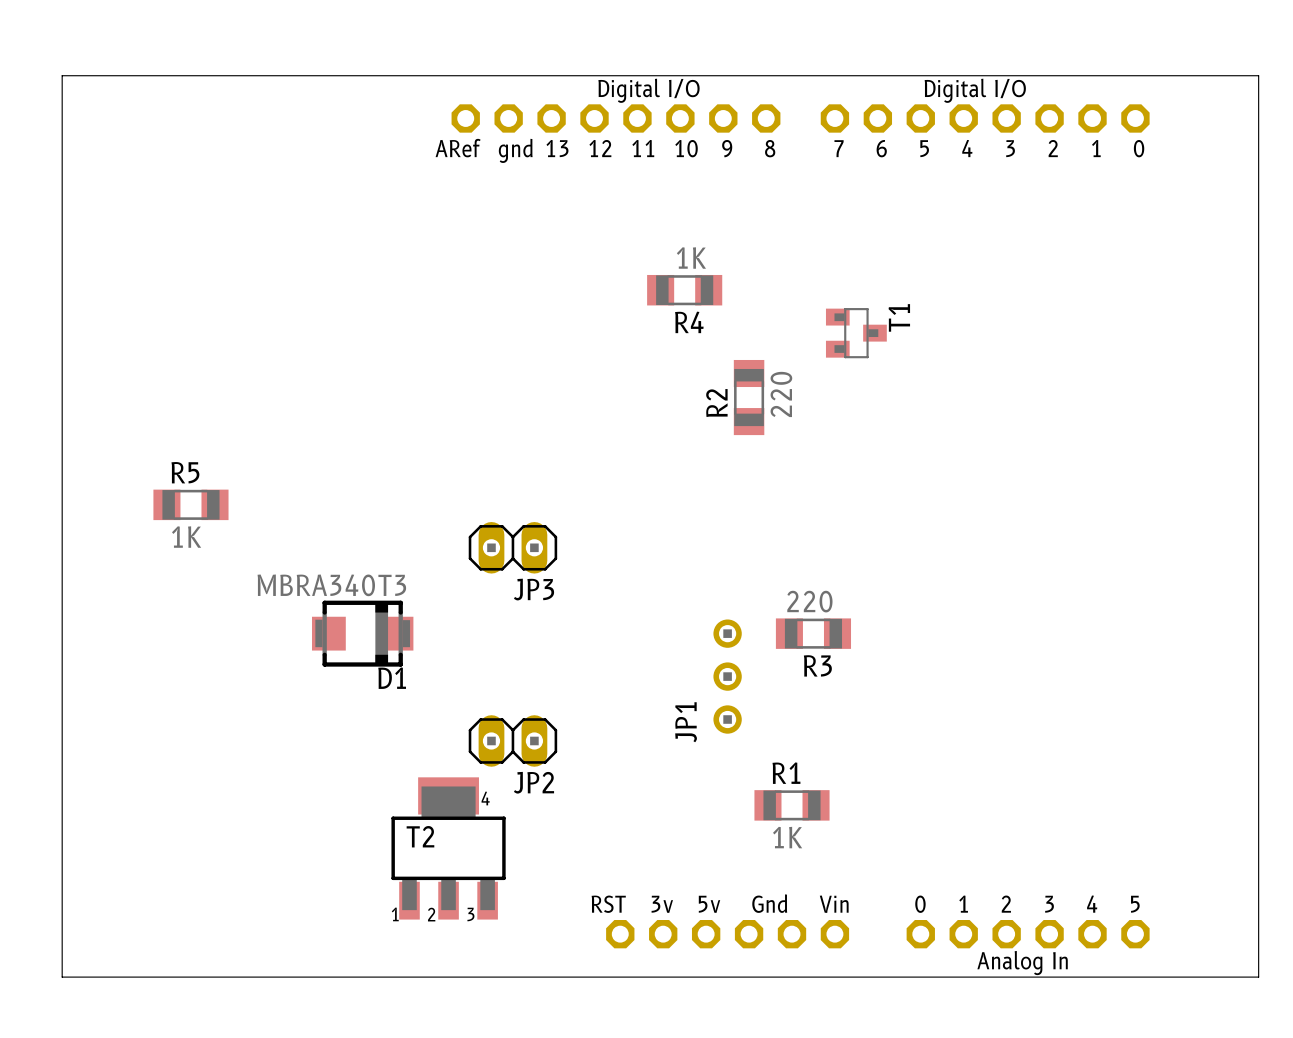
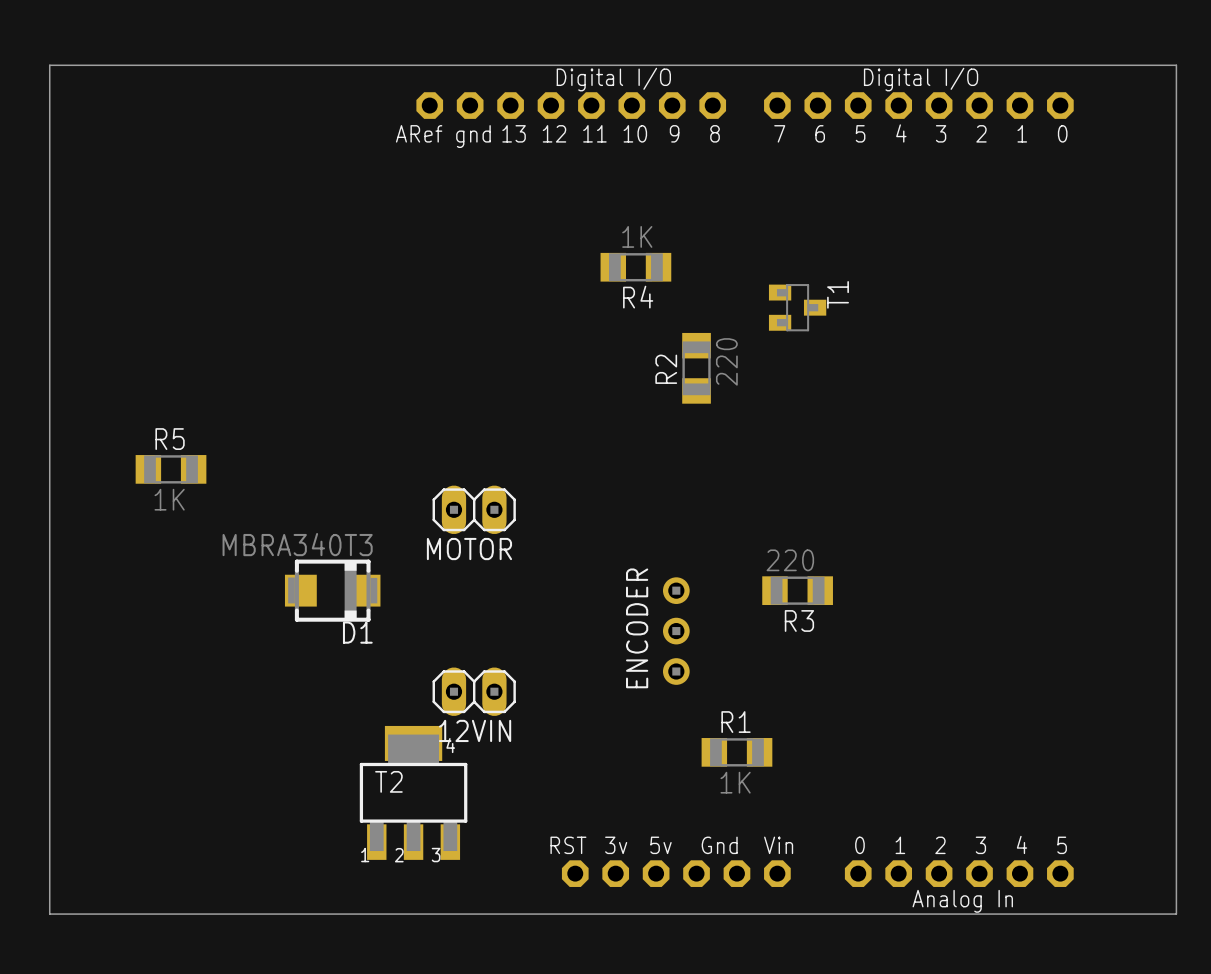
JP3 name: JP3 (534, 589) -> MOTOR (469, 549)
R3 position: (813, 633) -> (797, 590)
JP1 name: JP1 (686, 722) -> ENCODER (637, 628)
JP2 name: JP2 (534, 782) -> 12VIN (475, 730)

